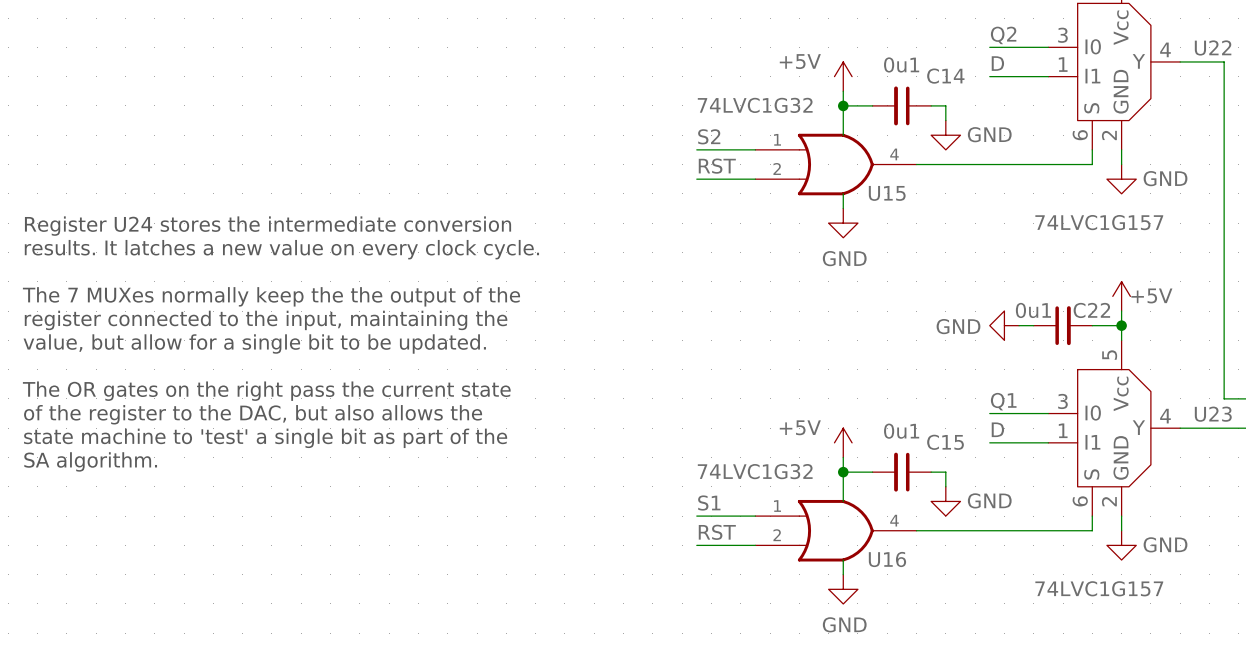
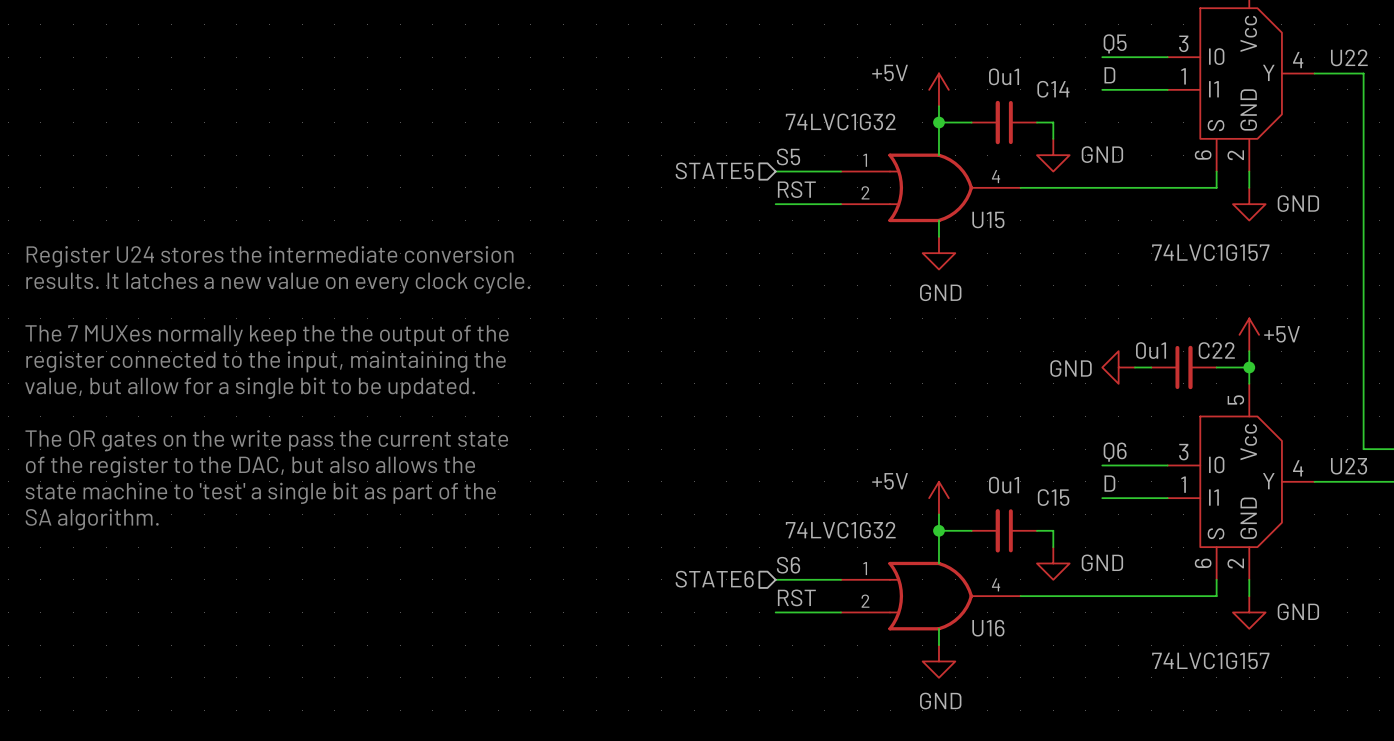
label: Q2 (1003, 35) -> Q5 (1115, 43)
label: S2 (709, 136) -> S5 (788, 156)
hierarchical label: none -> STATE5 (714, 170)
text: The OR gates on the right pass the current state (266, 391) -> The OR gates on the write pass the current state (266, 440)
label: Q1 (1003, 401) -> Q6 (1115, 452)
label: S1 (709, 503) -> S6 (788, 565)
hierarchical label: none -> STATE6 (714, 579)

